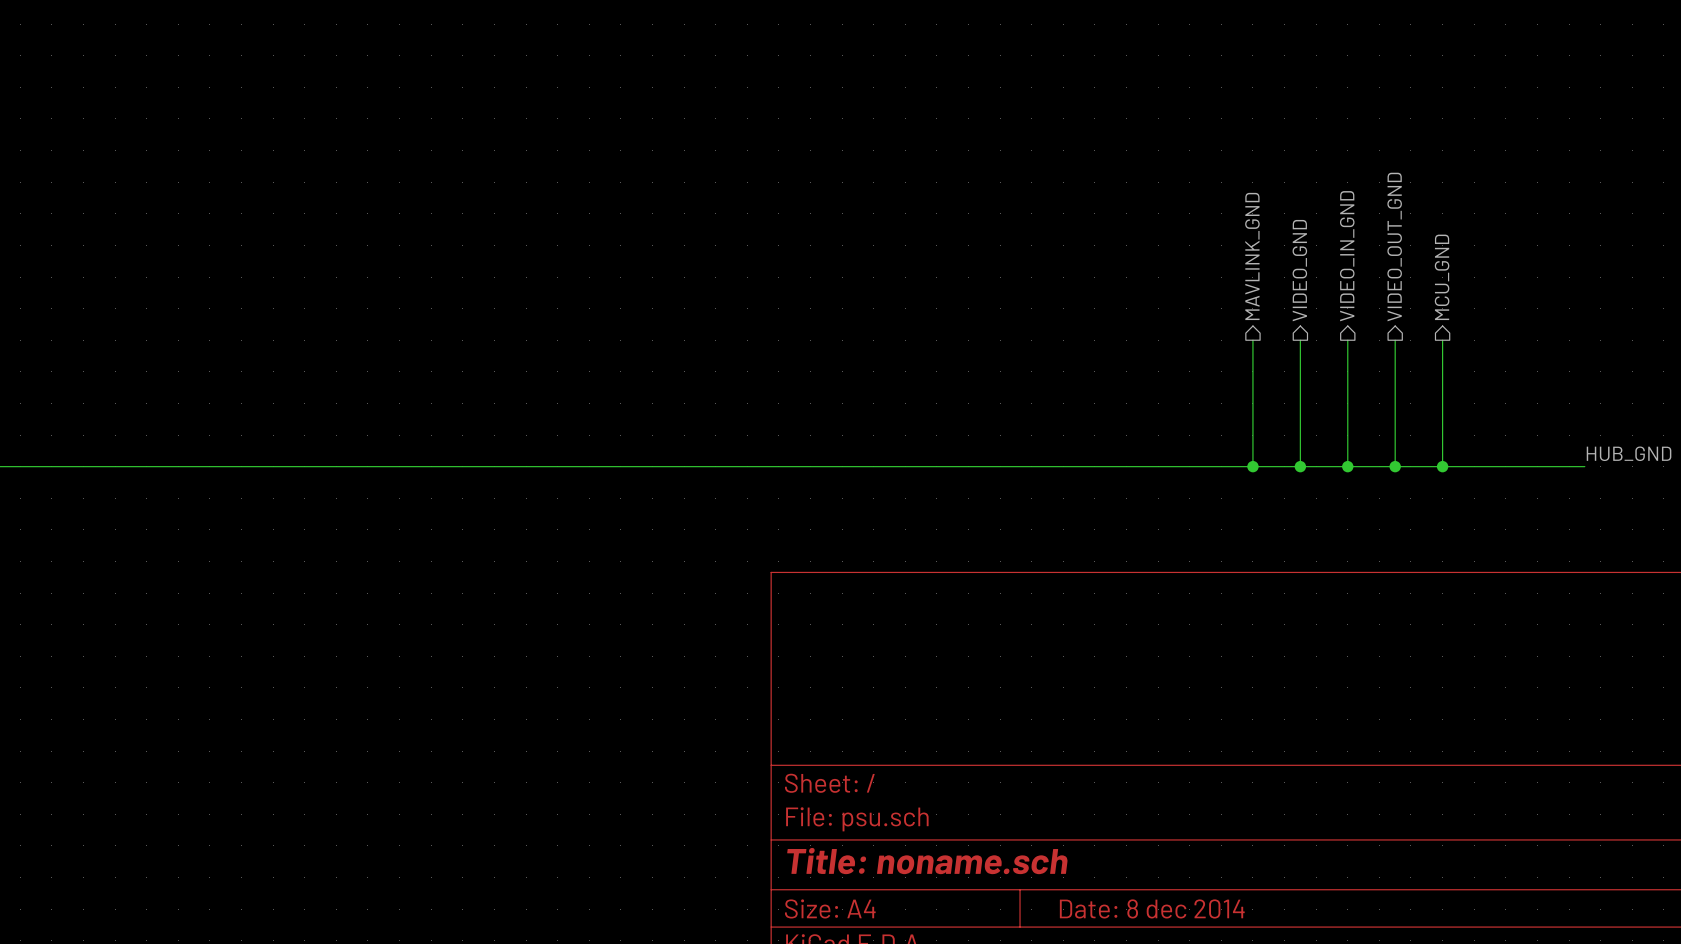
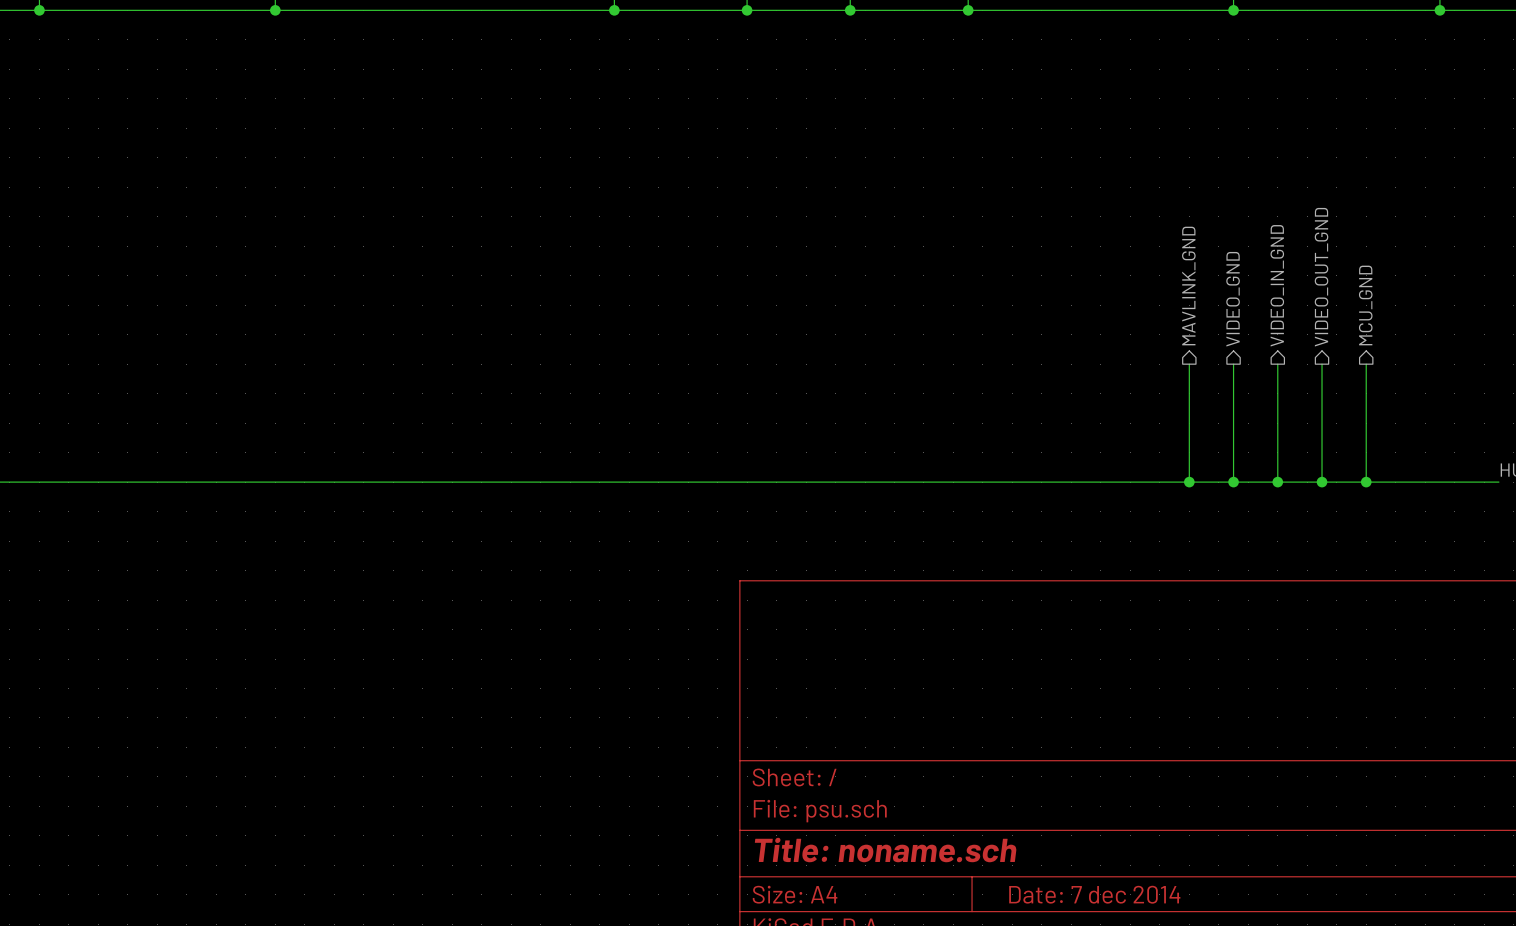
title block: Date: 8 dec 2014 (1152, 908) -> Date: 7 dec 2014 (1094, 894)

